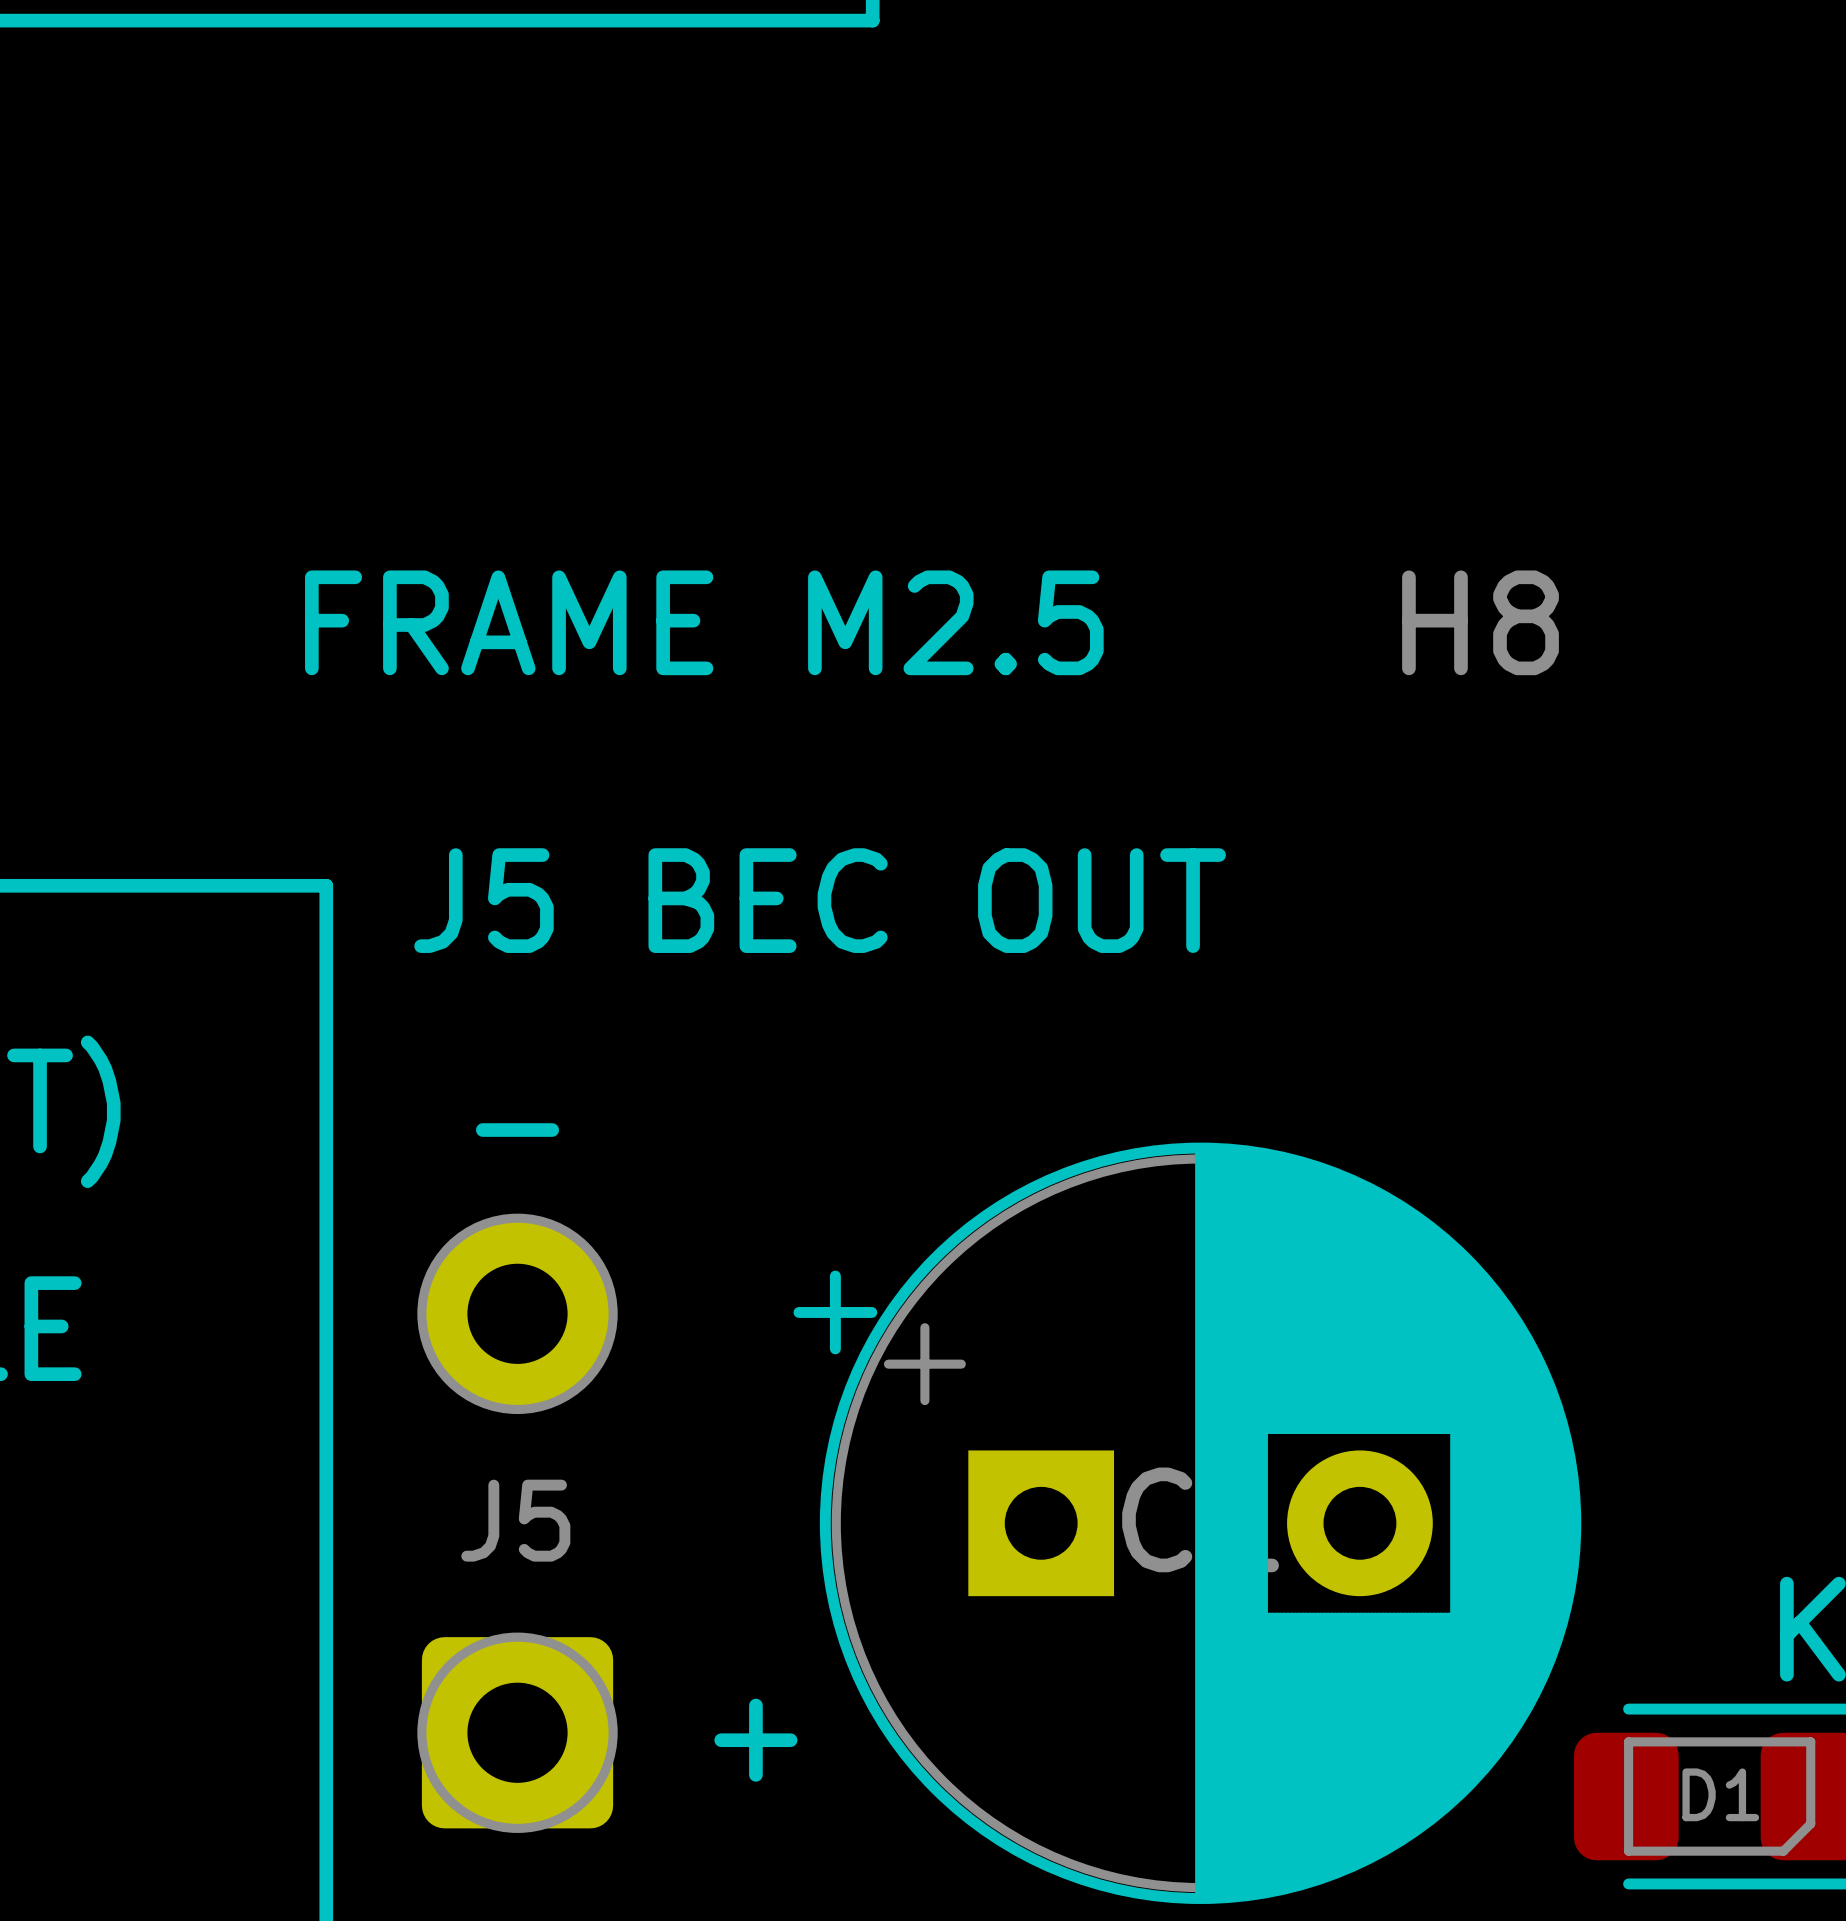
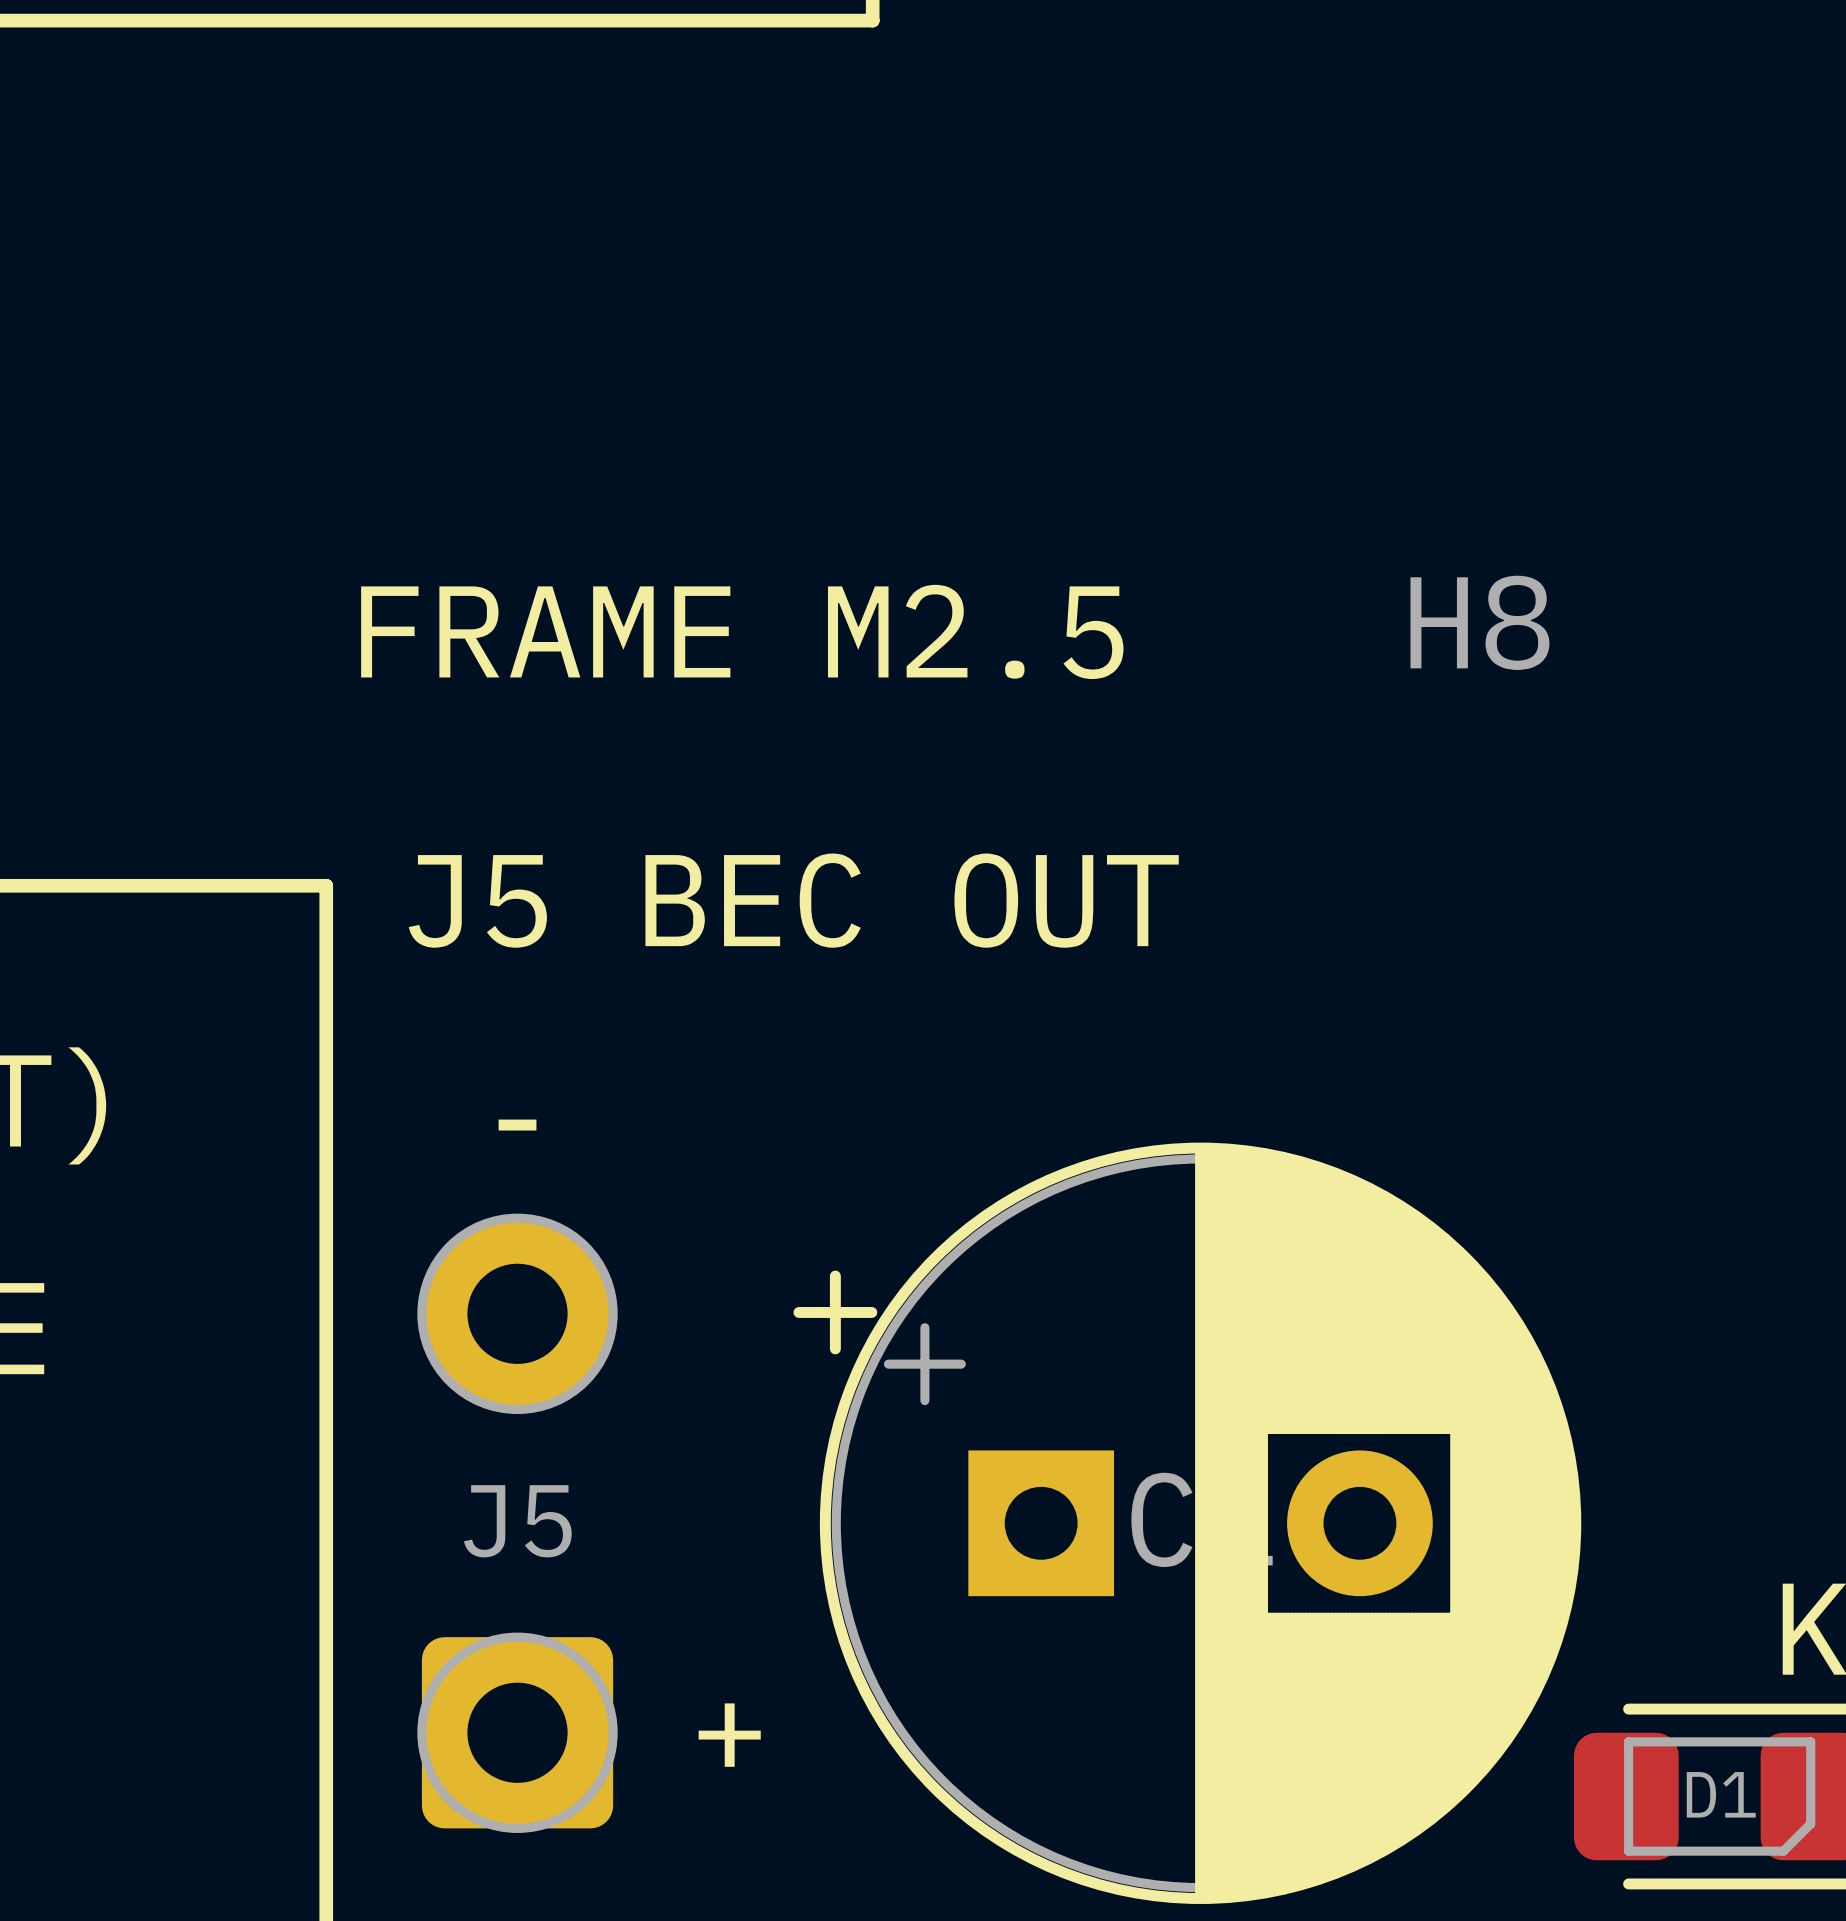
text position: FRAME M2.5 (704, 622) -> FRAME M2.5 (742, 631)

